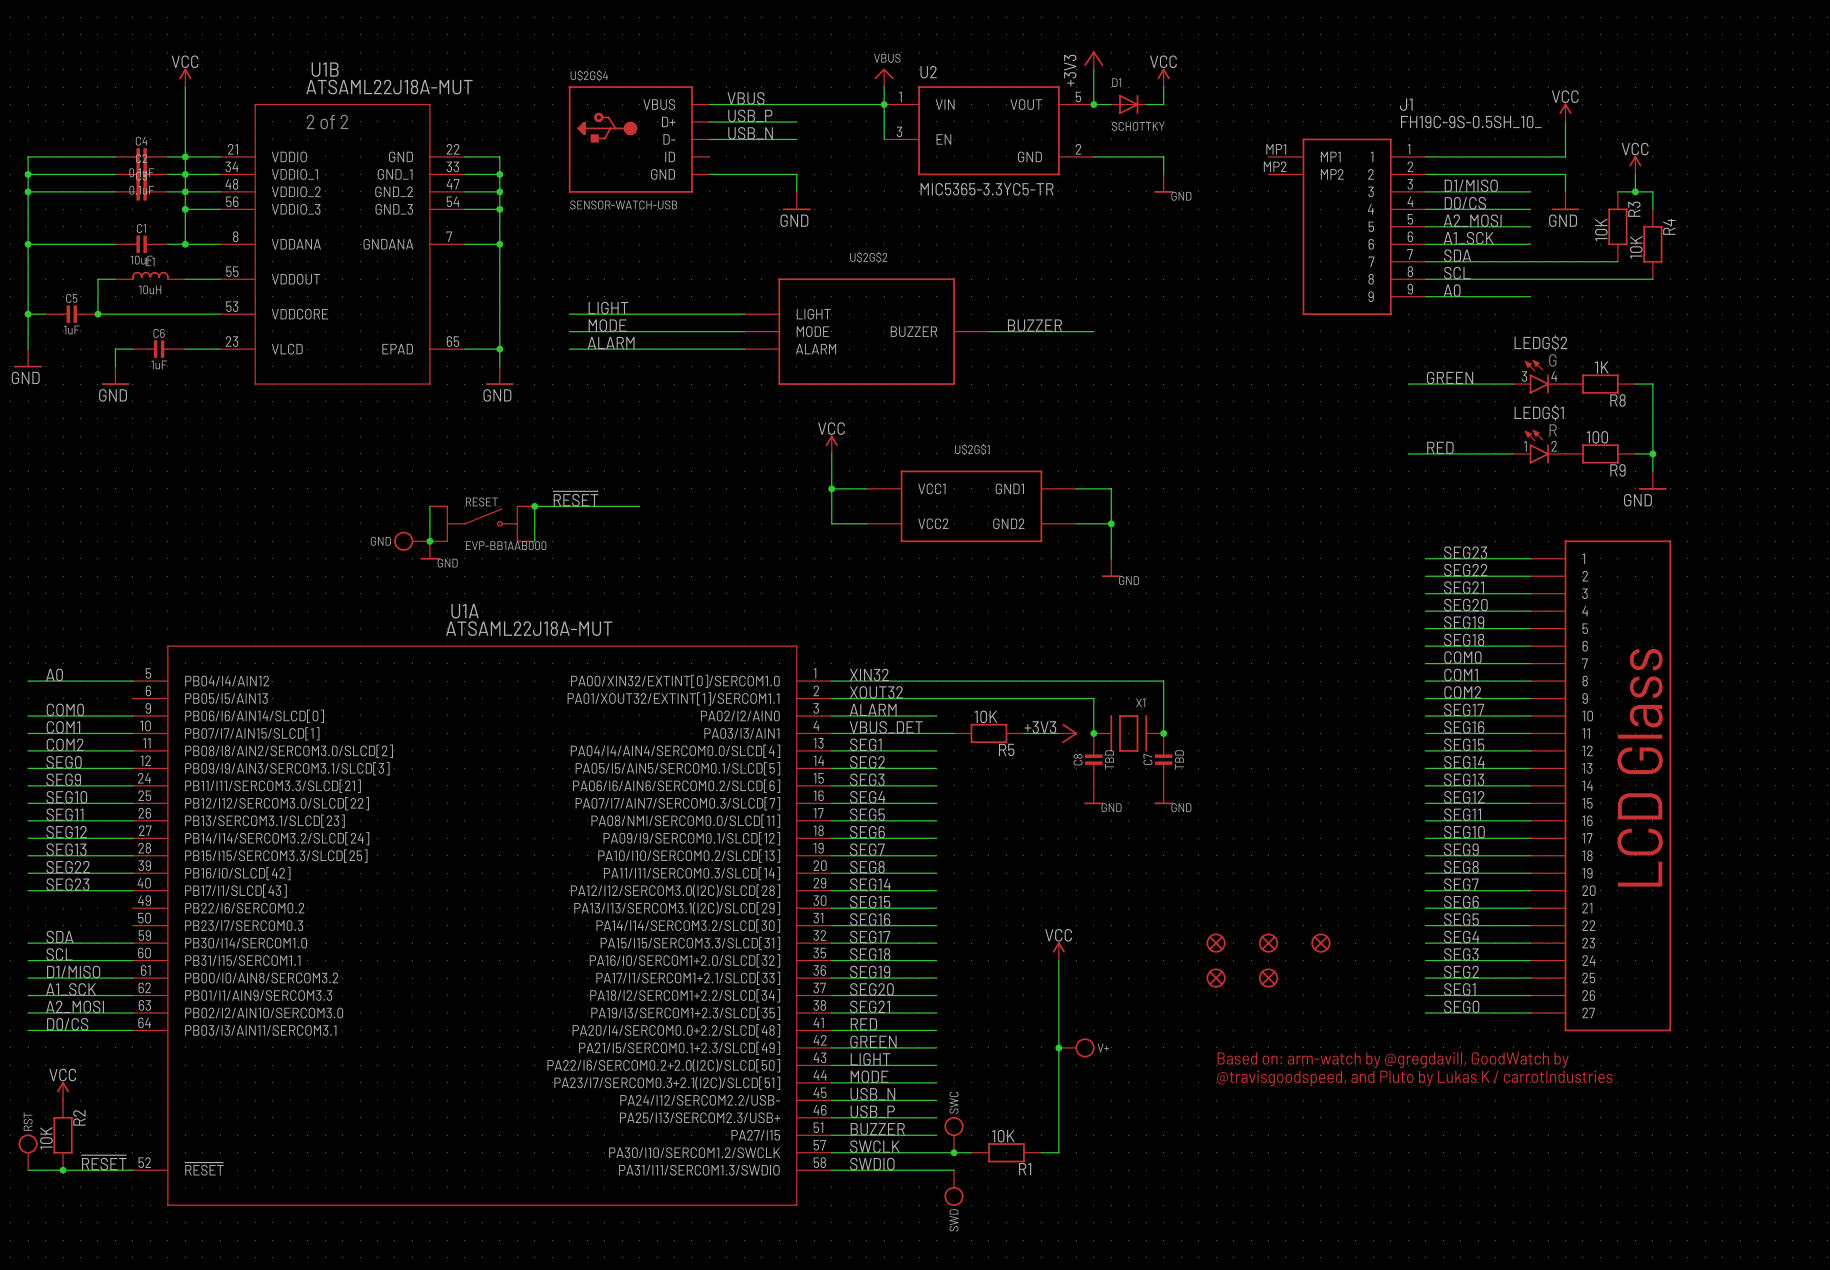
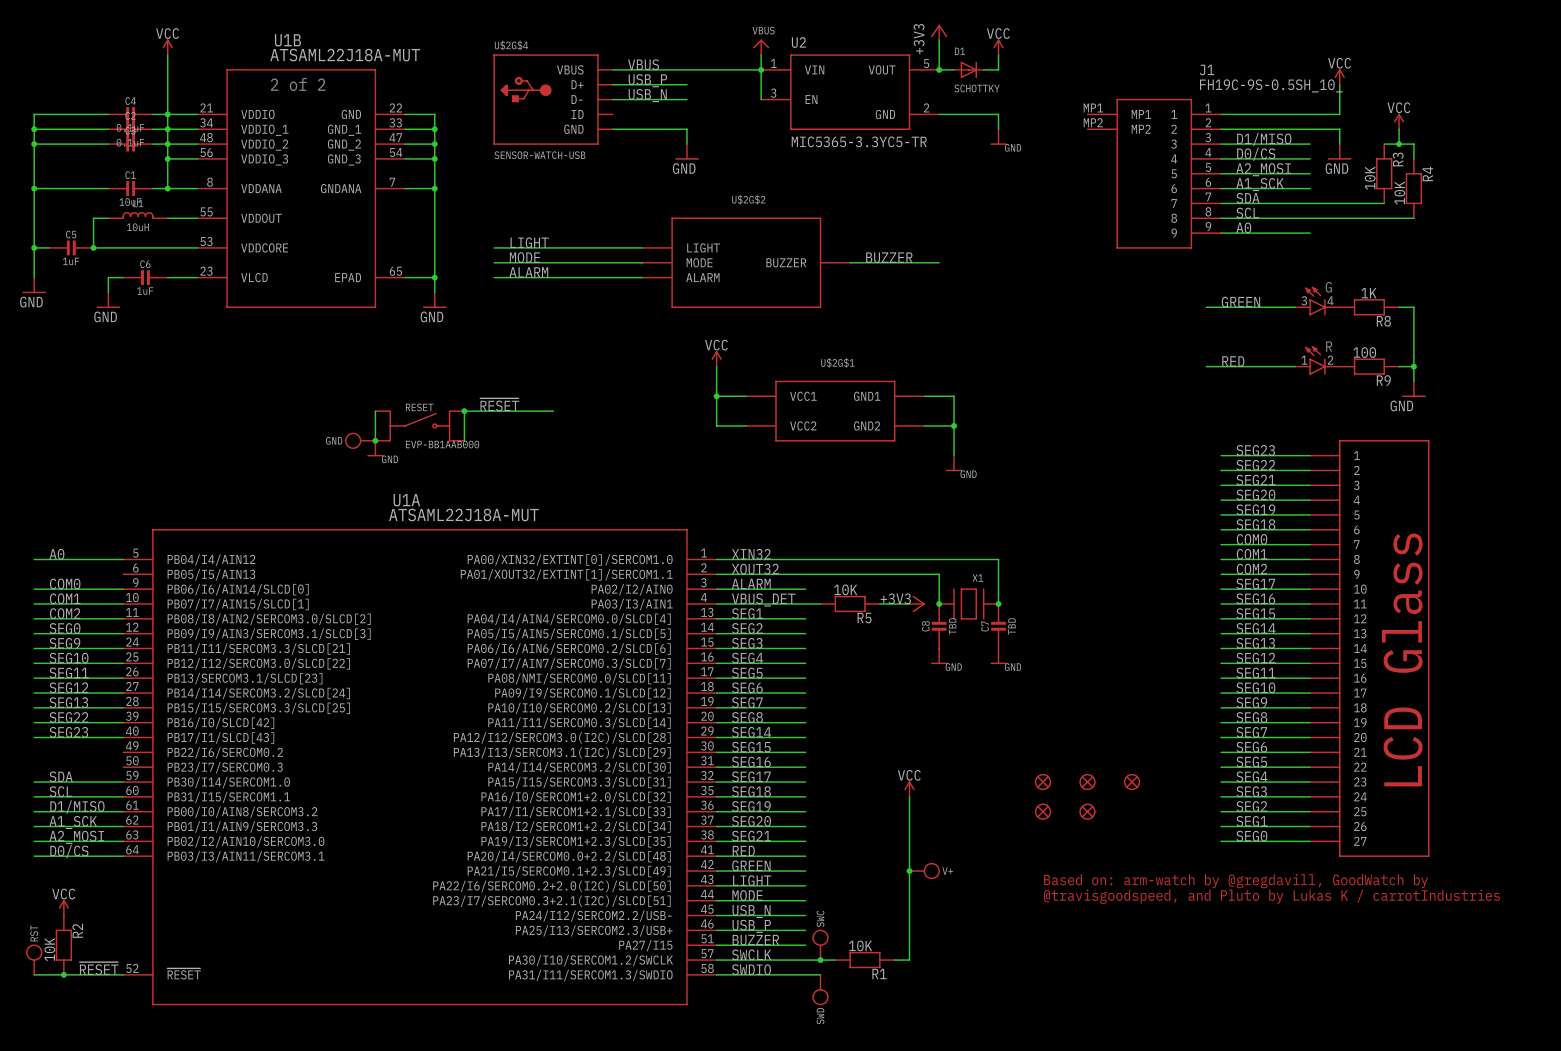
LEDG$2 name: LEDG$2 (1540, 342) -> none
LEDG$1 name: LEDG$1 (1539, 412) -> none

